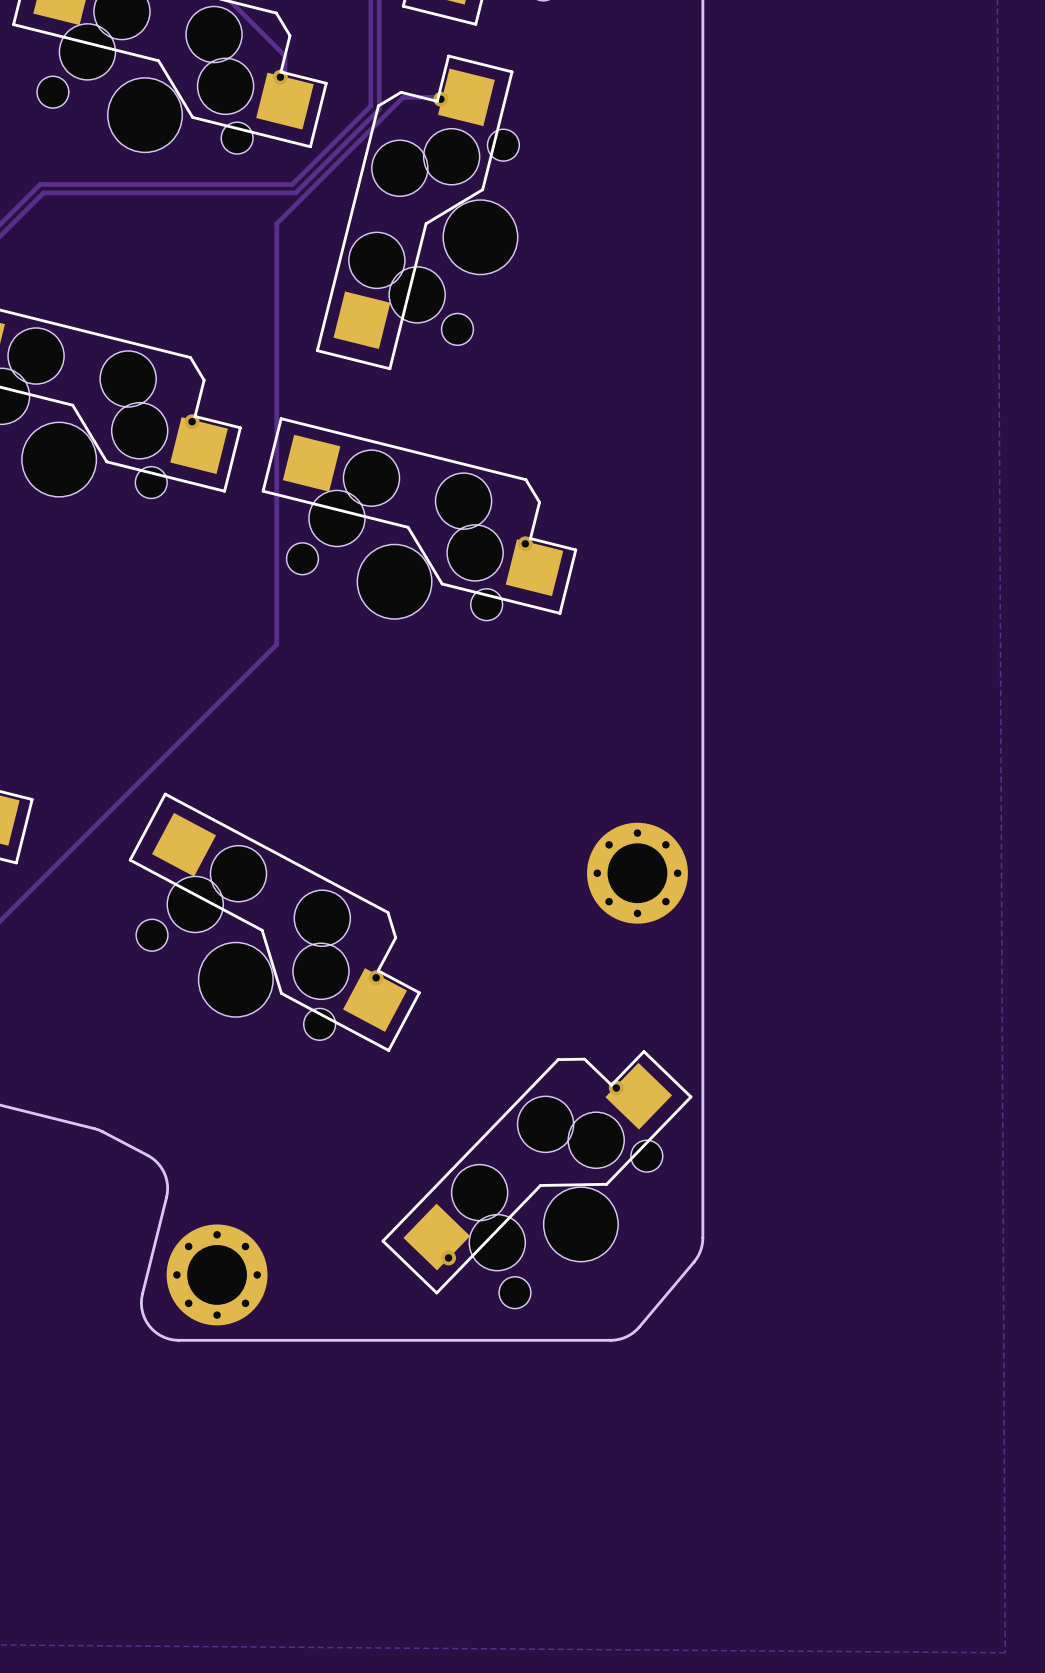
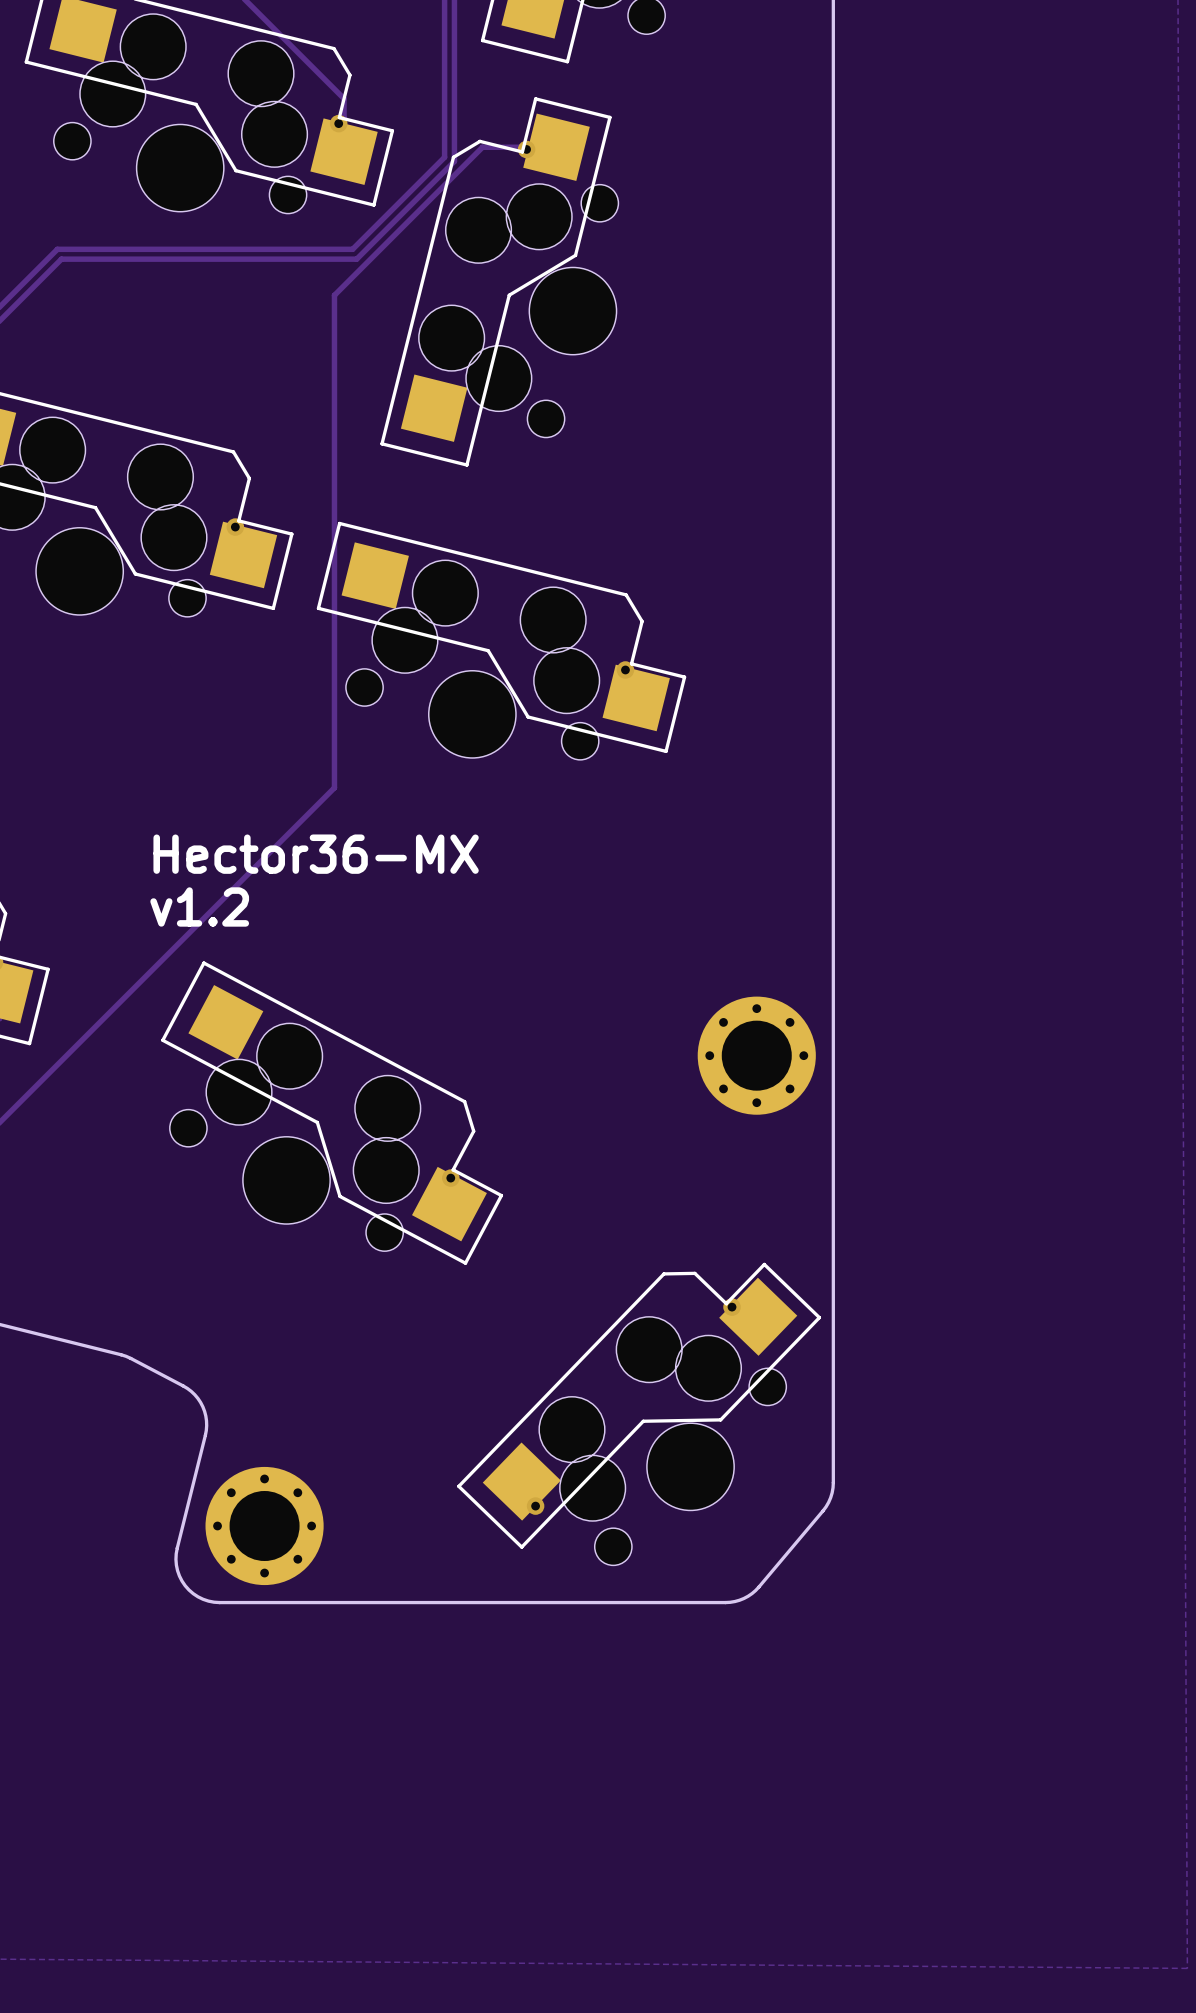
text: none -> Hector36-MX (316, 854)
text: none -> v1.2 (199, 906)

